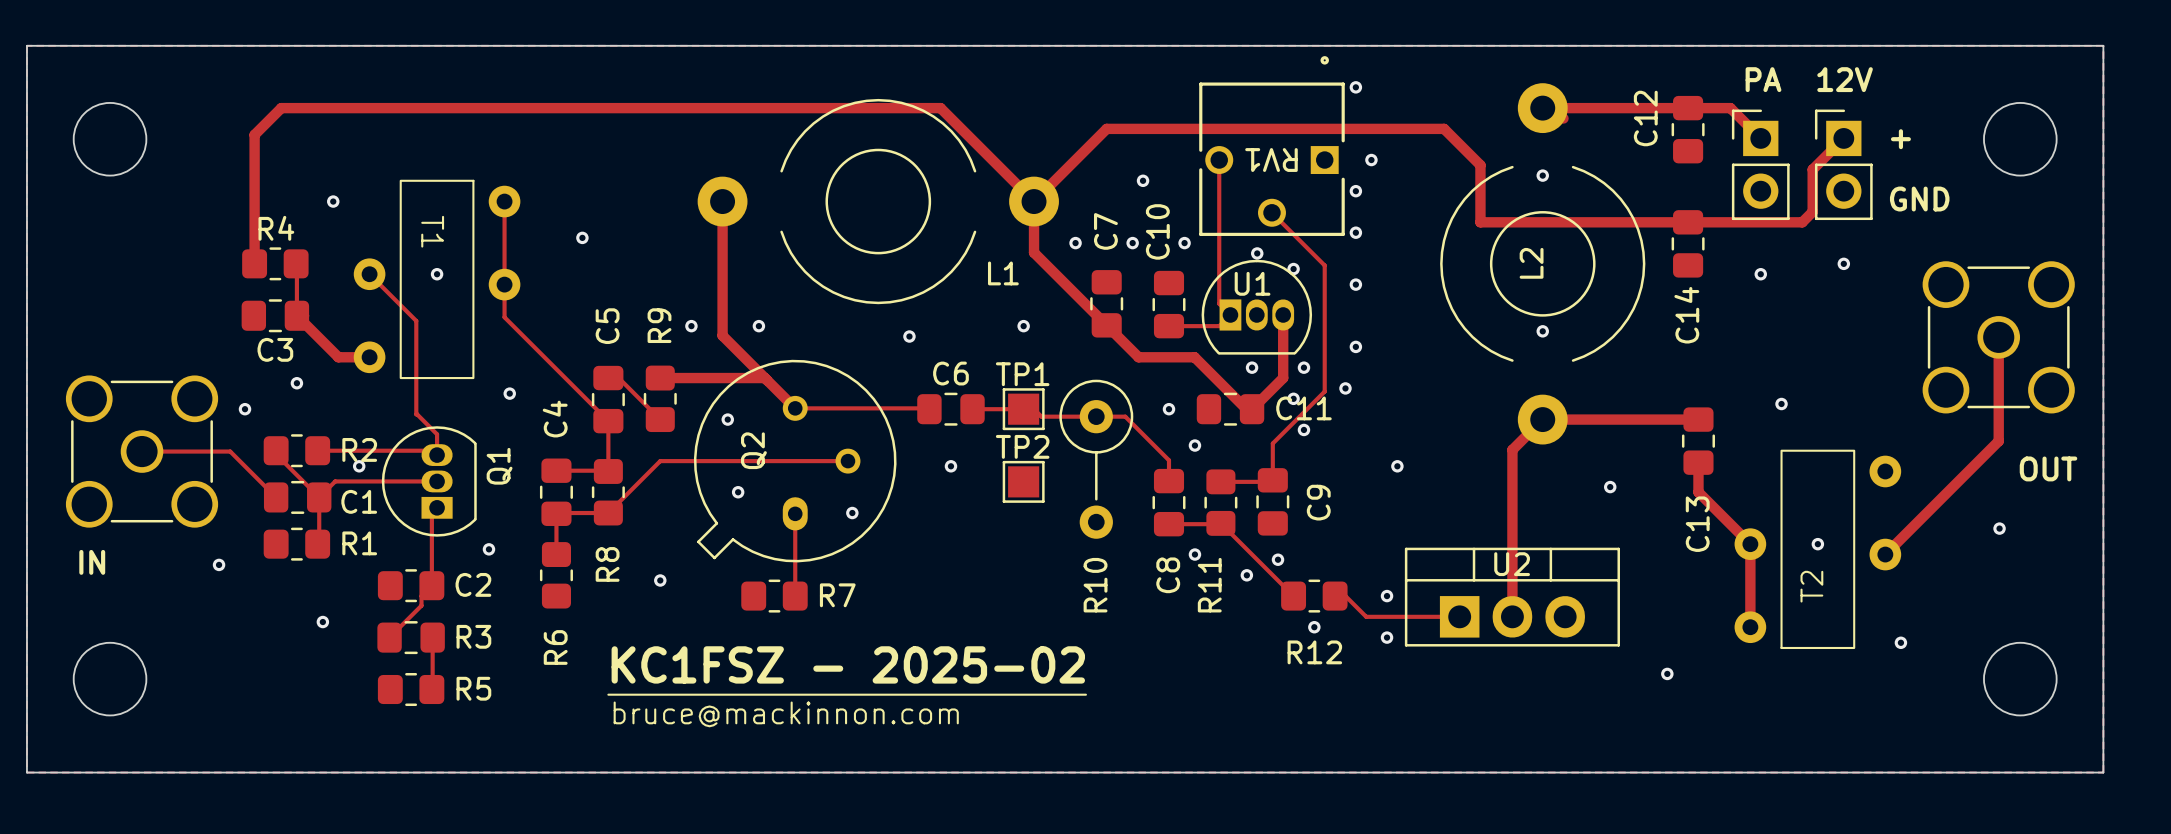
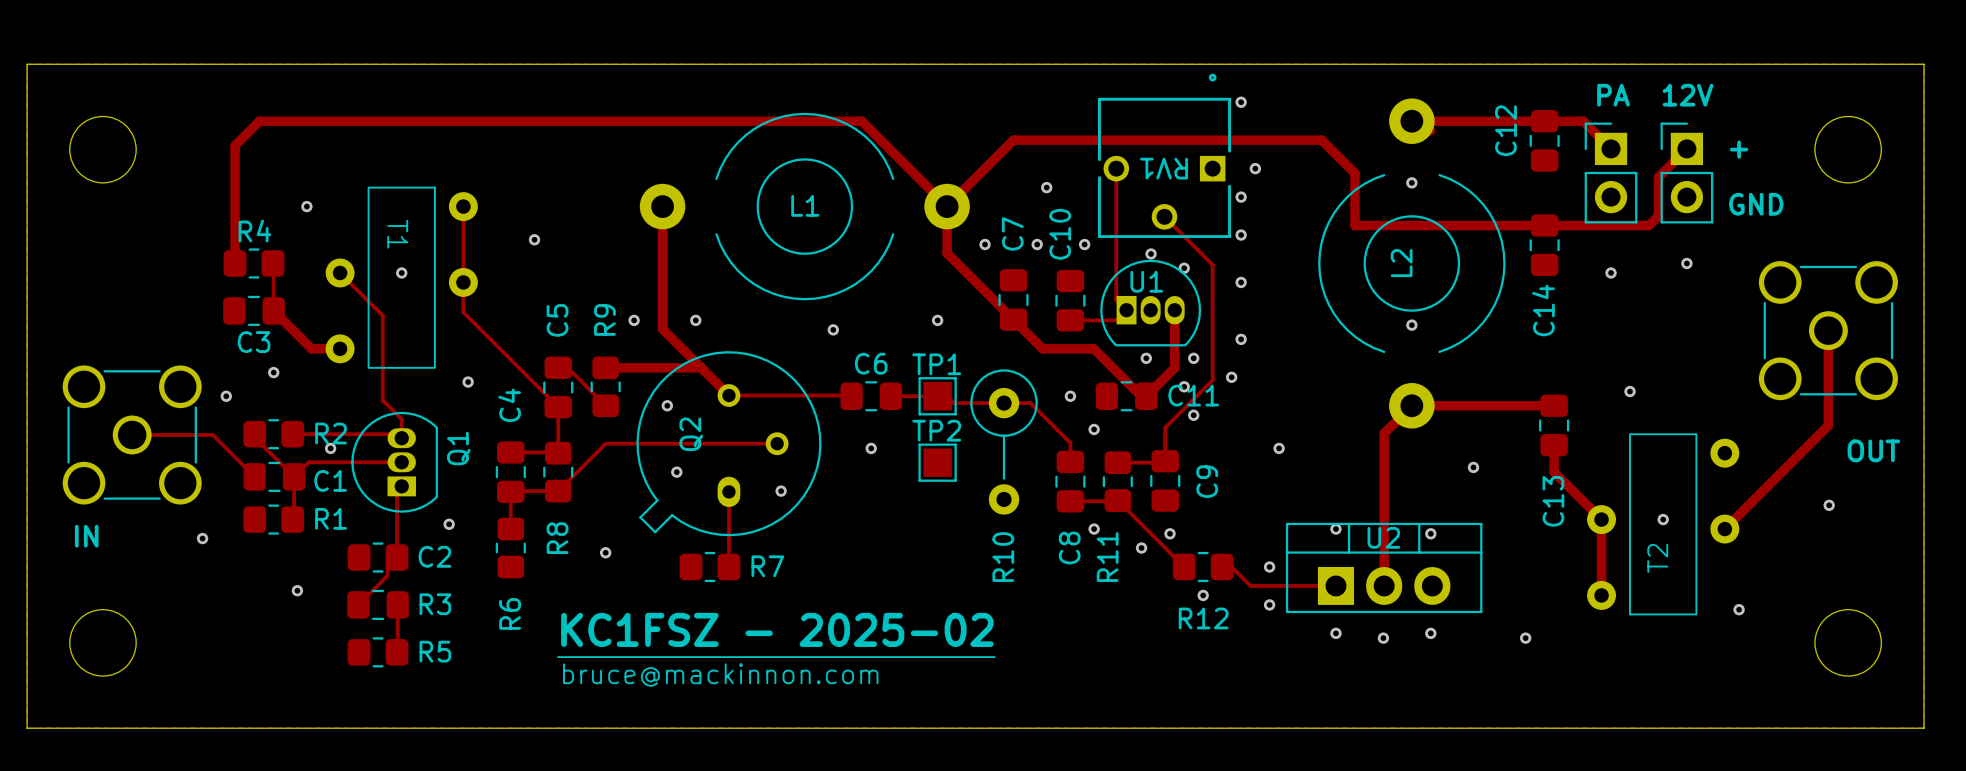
L1 name position: L1 (1003, 273) -> L1 (805, 205)
via: none -> (1335, 529)
via: none -> (1430, 533)
via: none -> (1335, 633)
via: none -> (1430, 633)
via: none -> (1383, 638)

